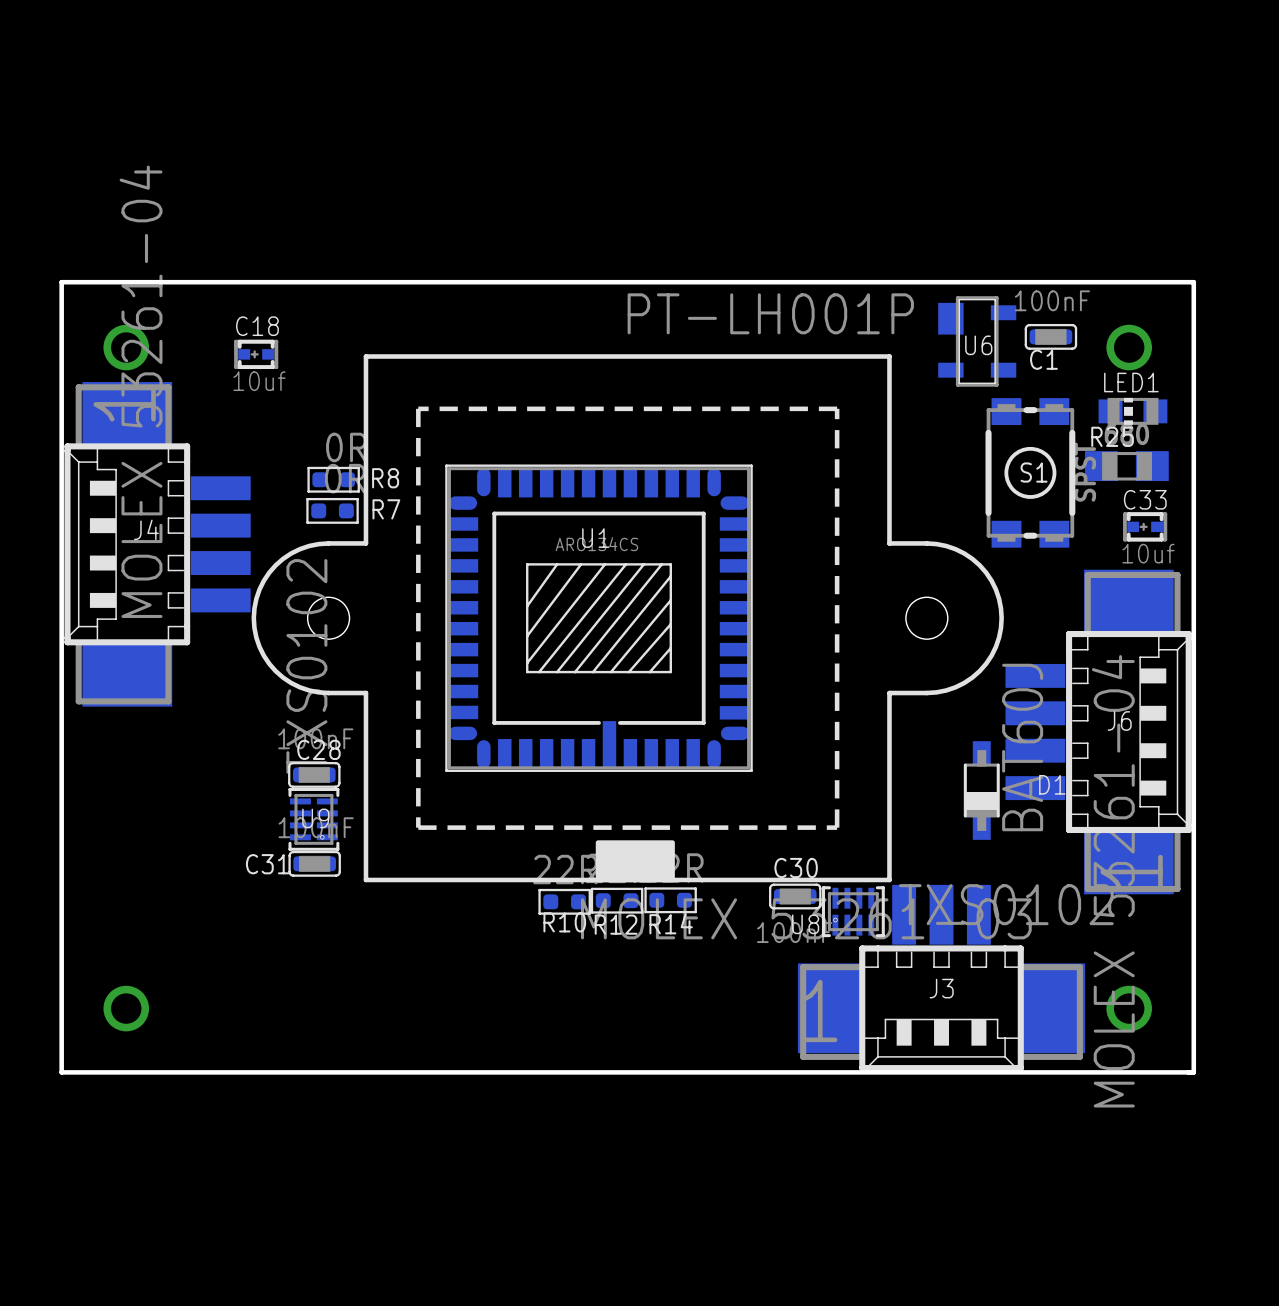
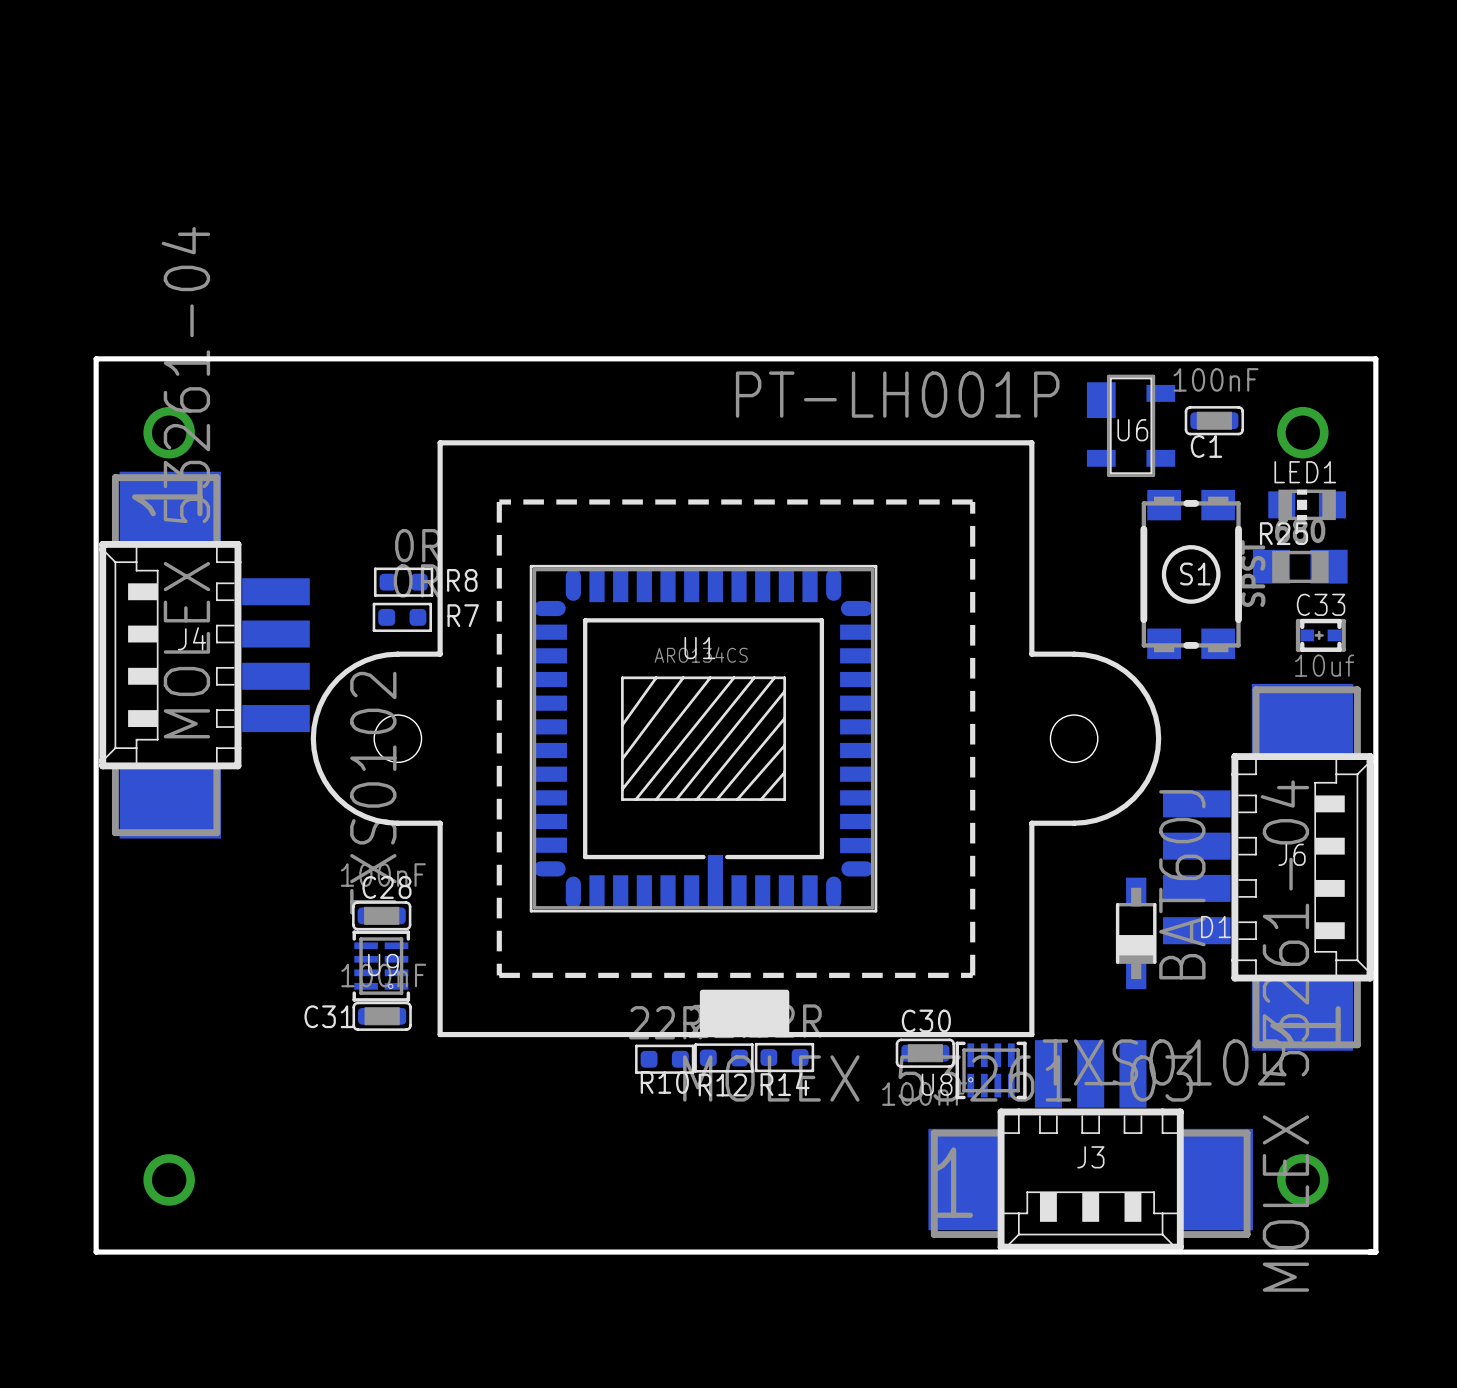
C18: 10uf (256, 354) -> none

